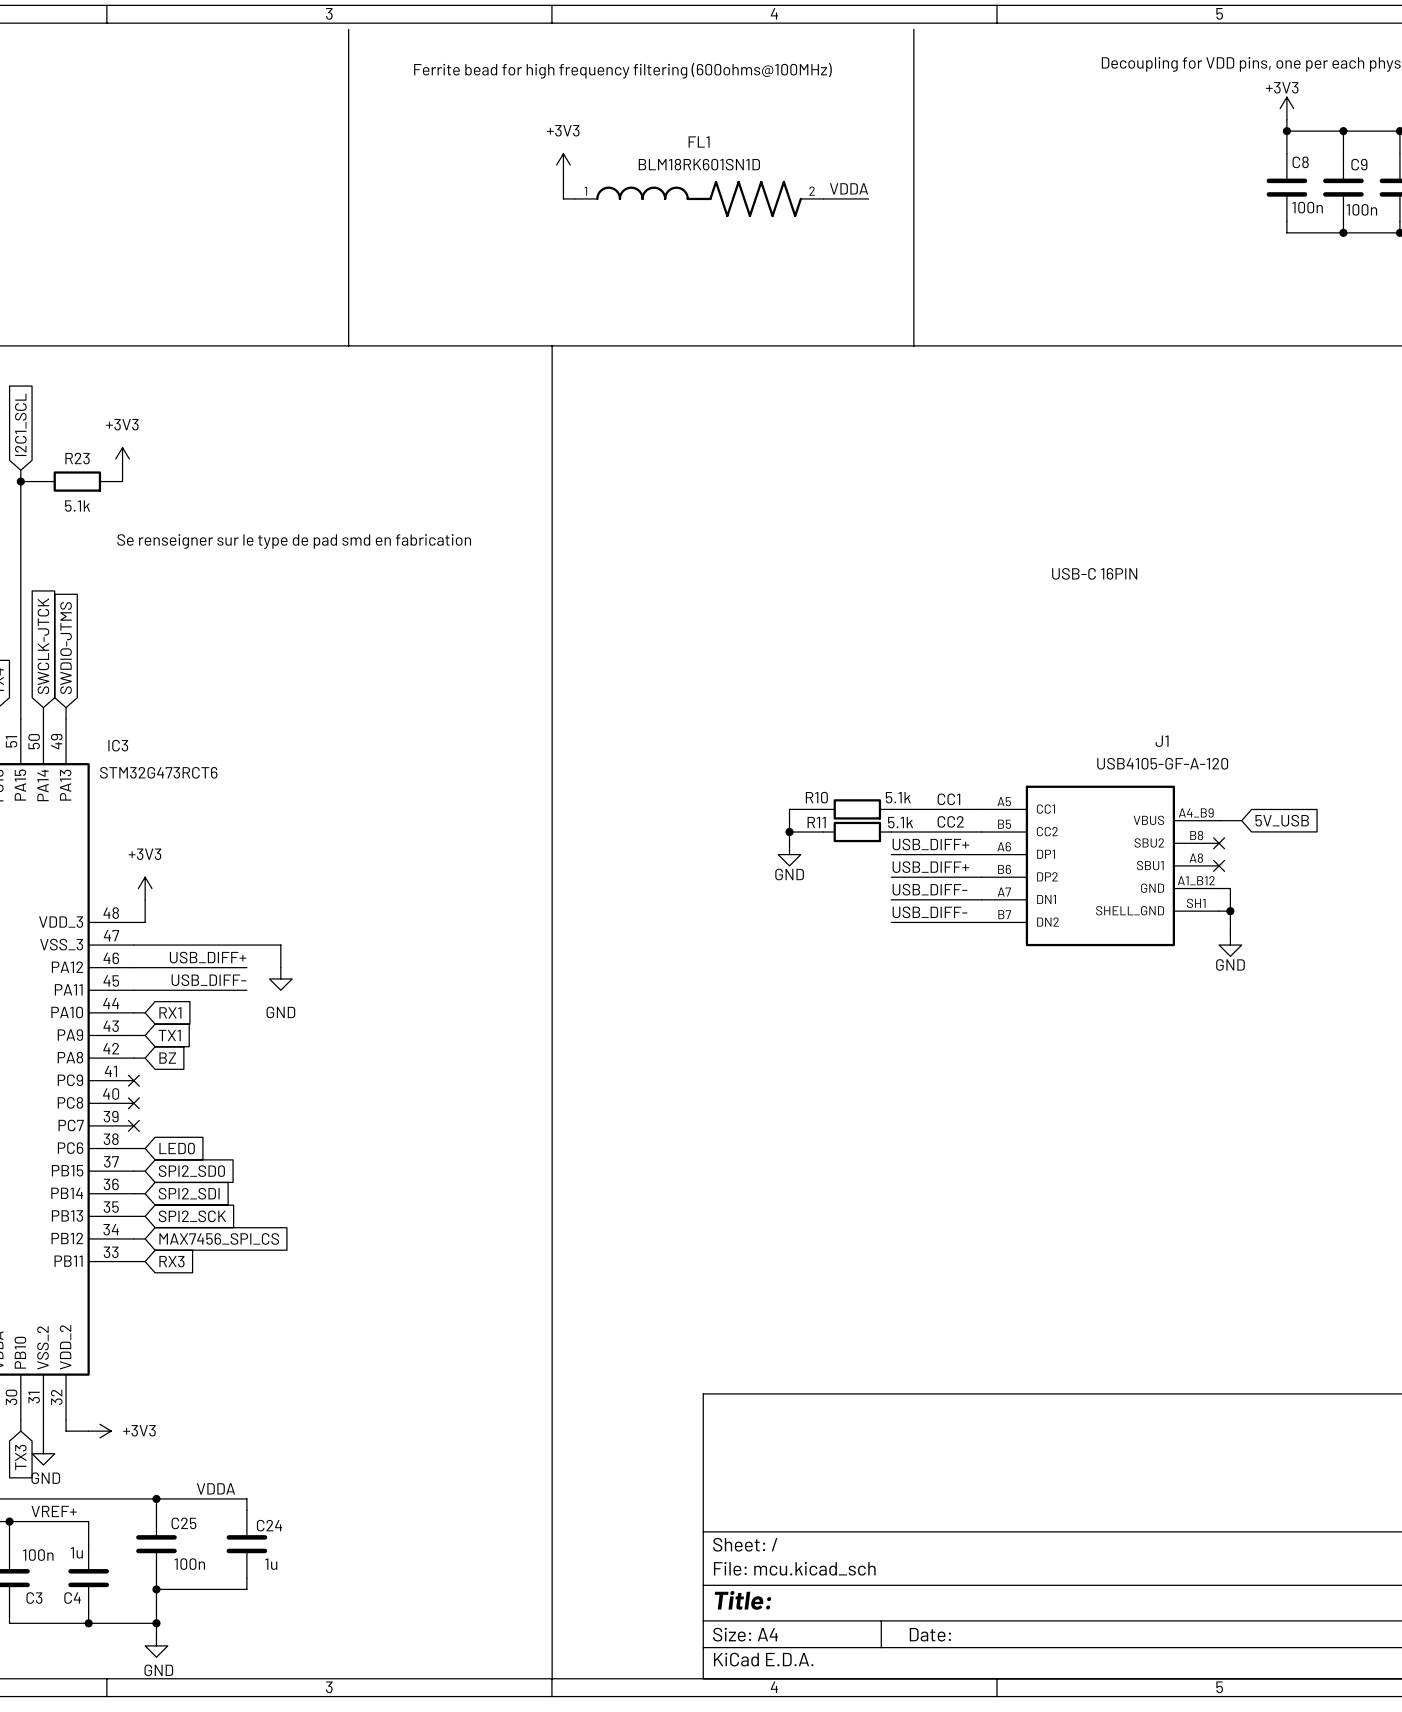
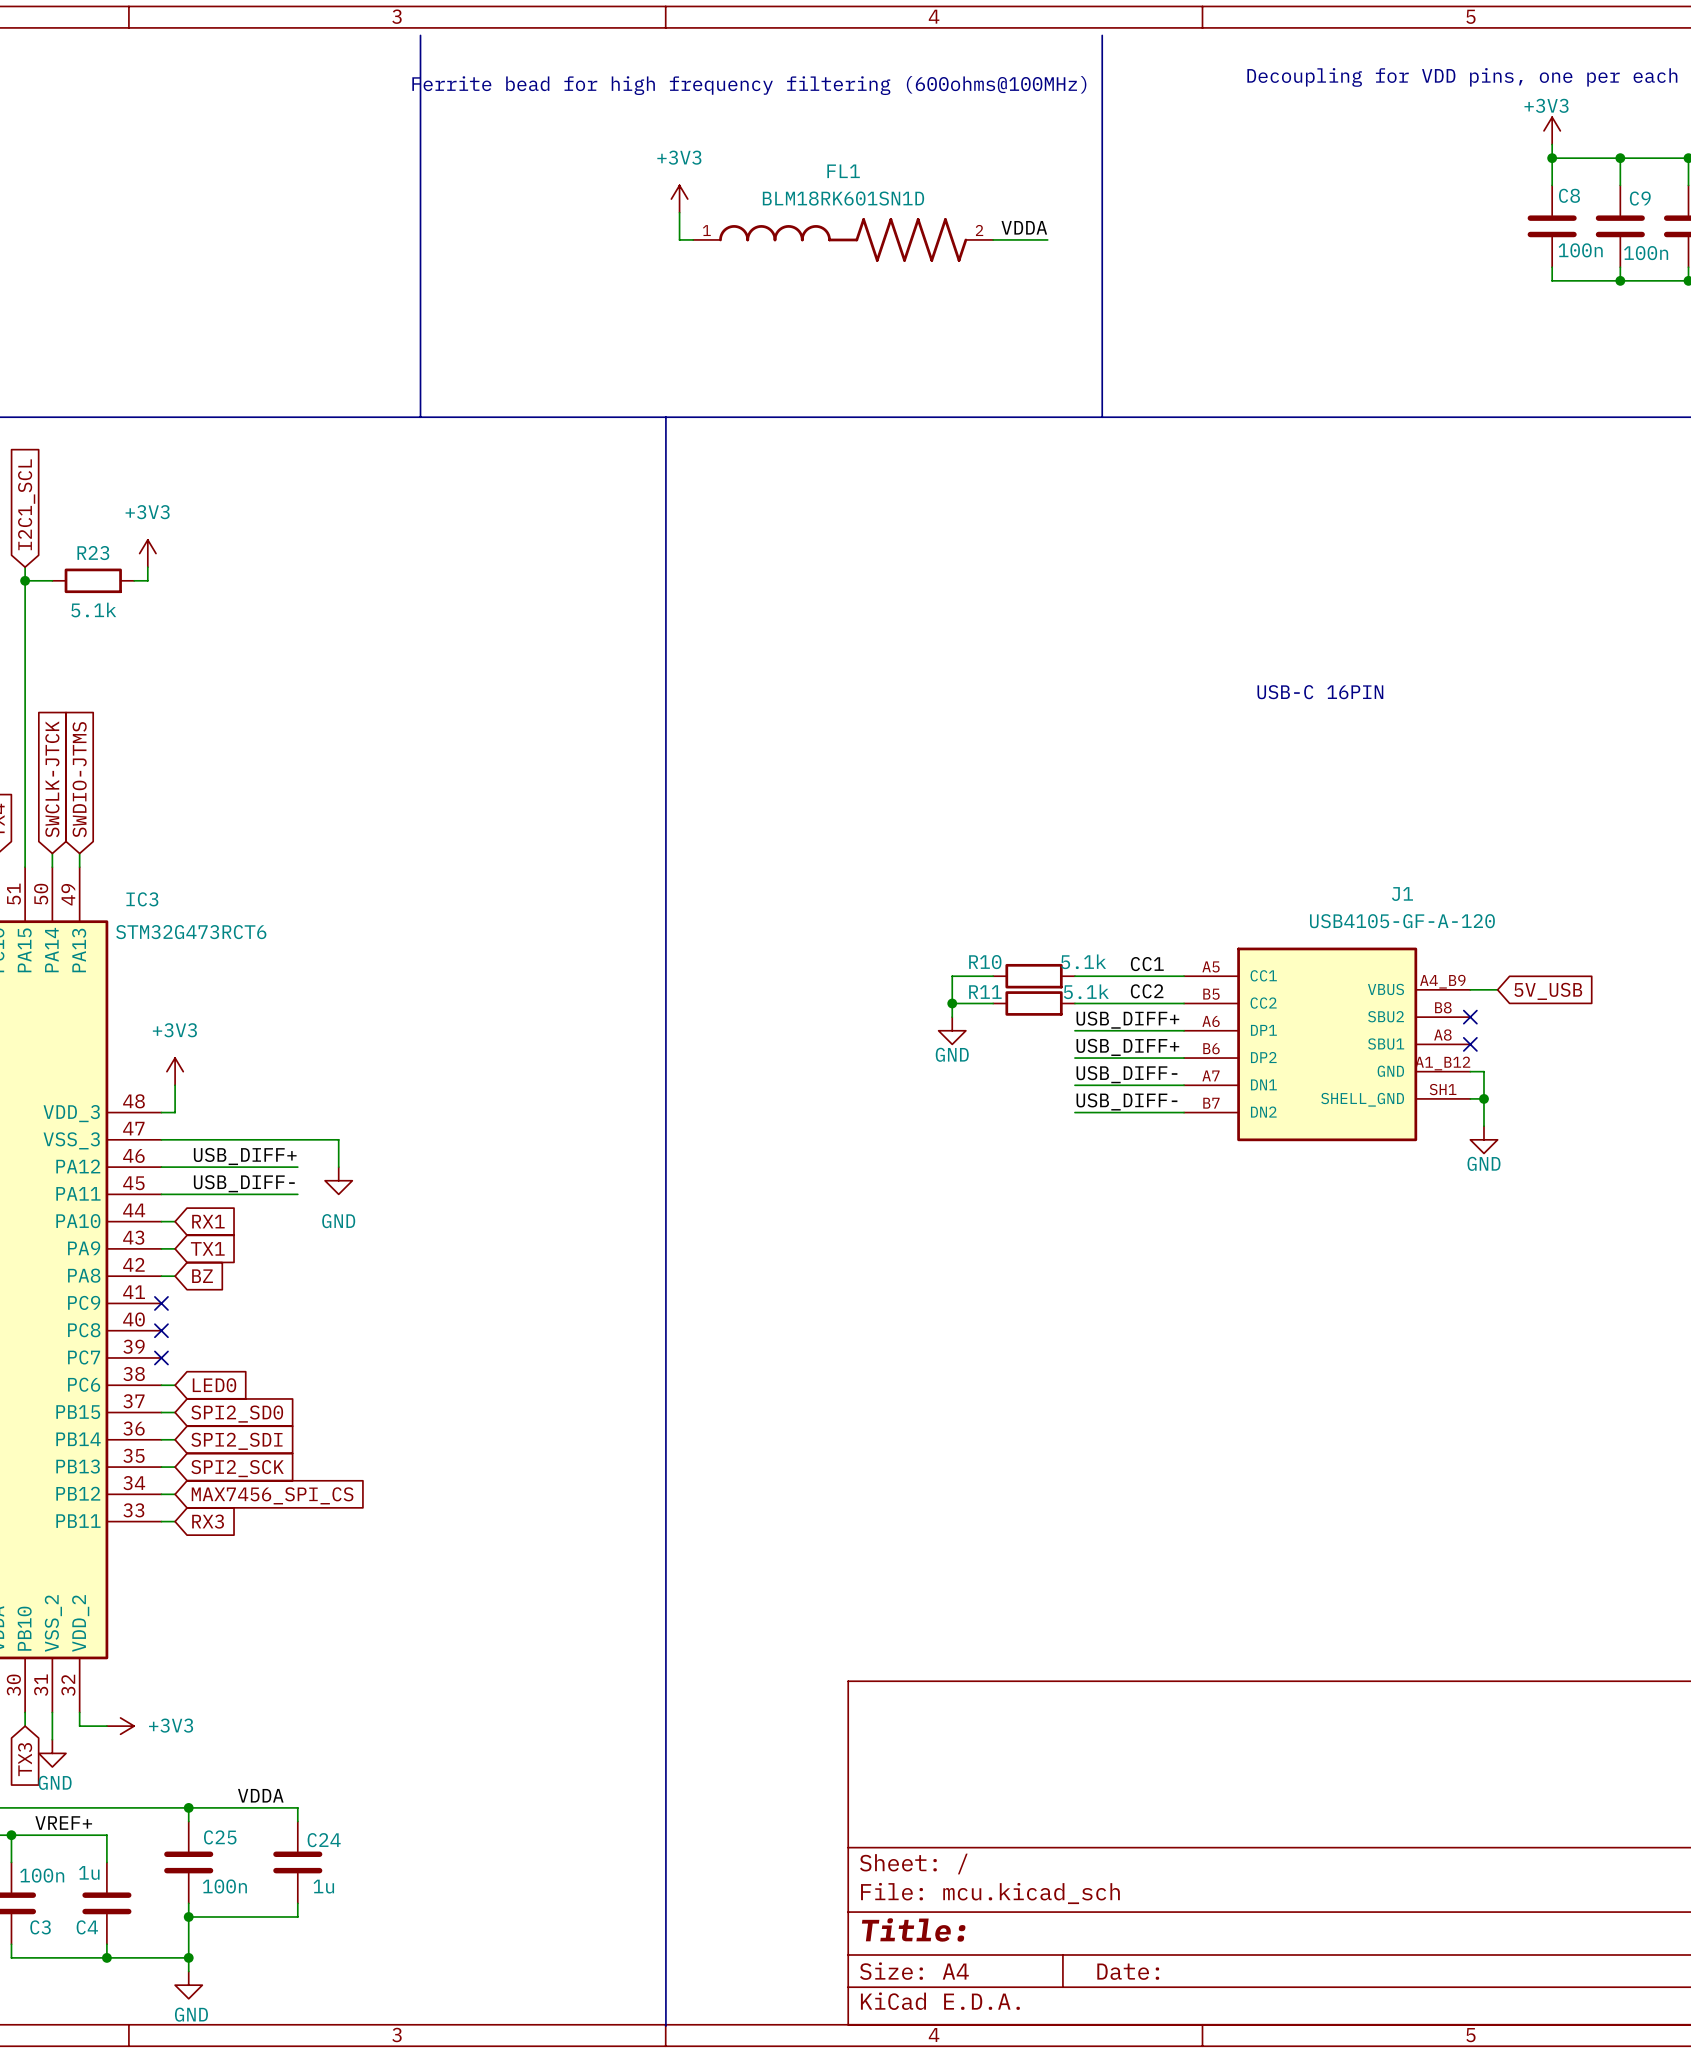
text: Se renseigner sur le type de pad smd en fabrication (294, 541) -> none

